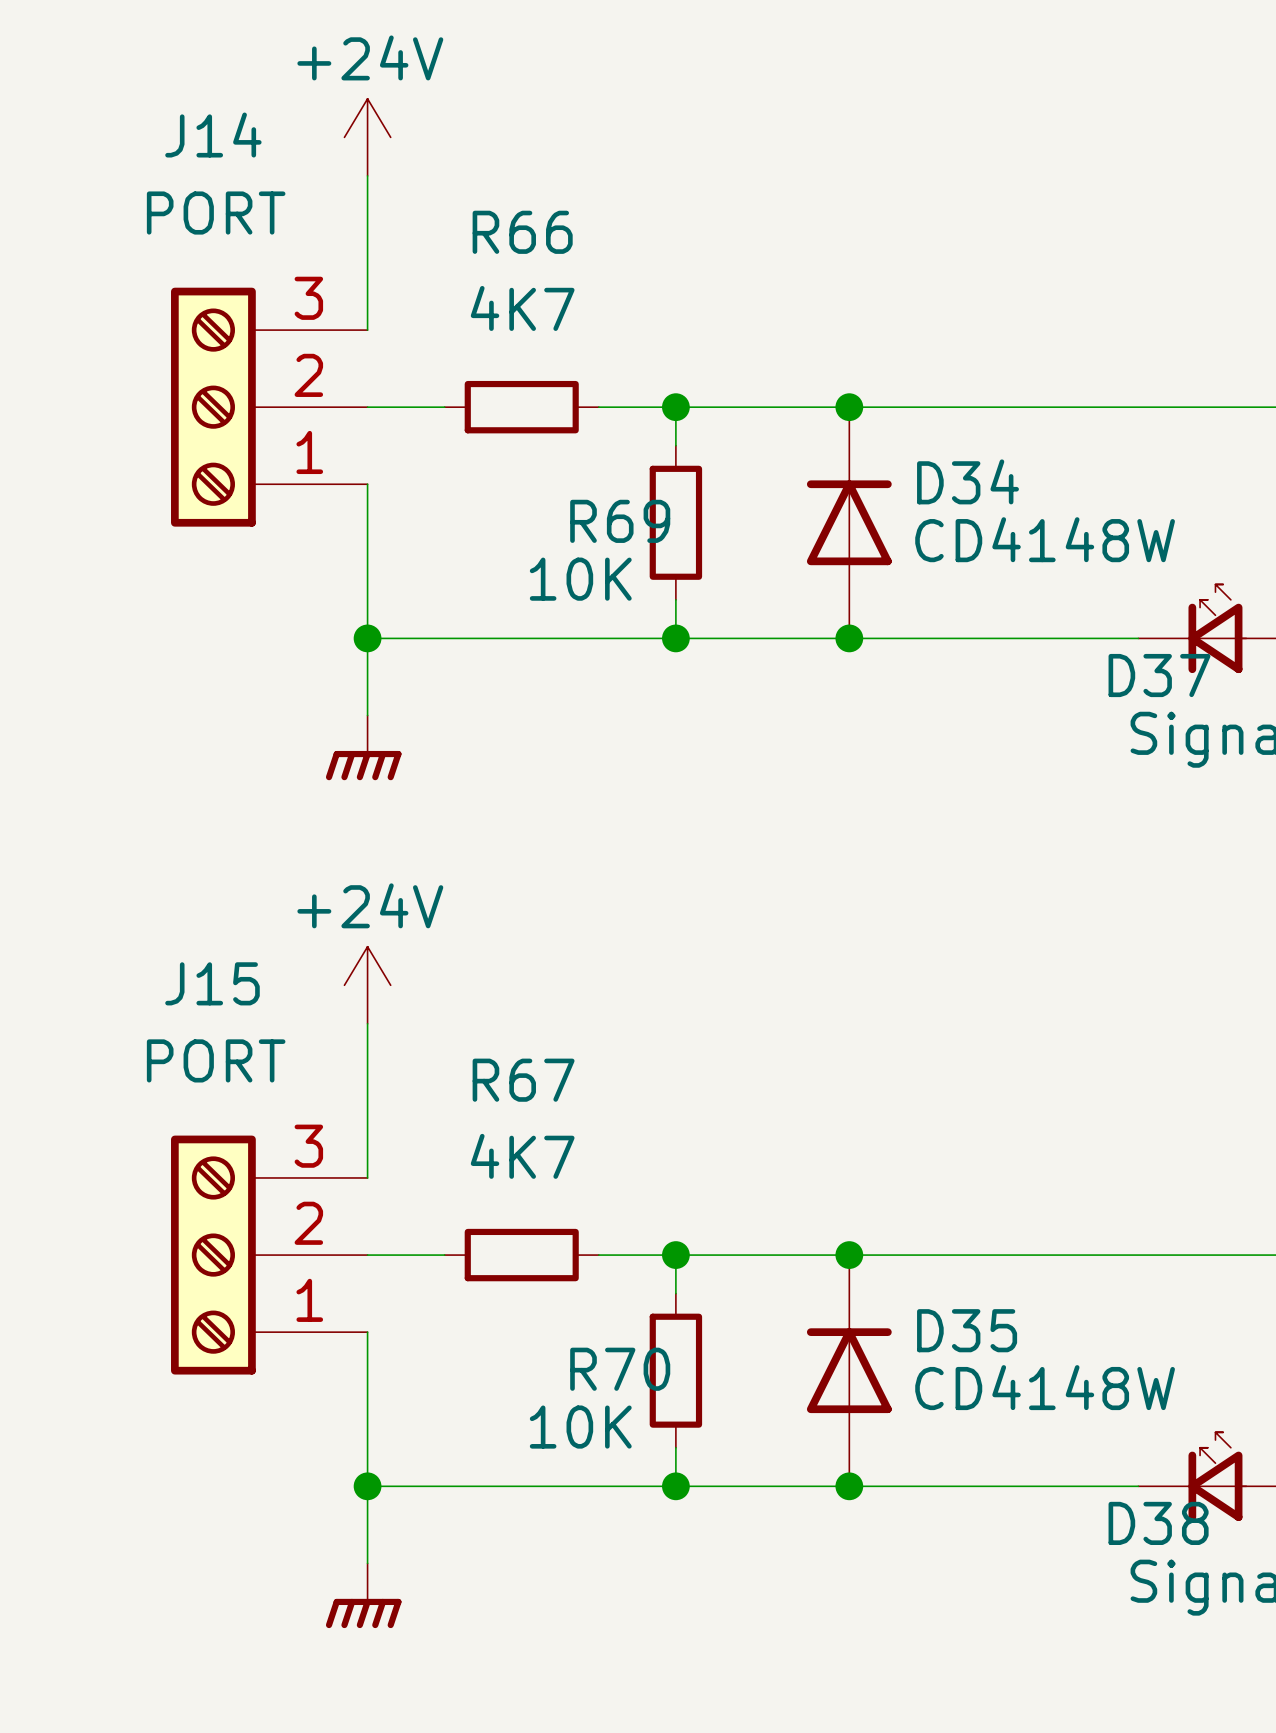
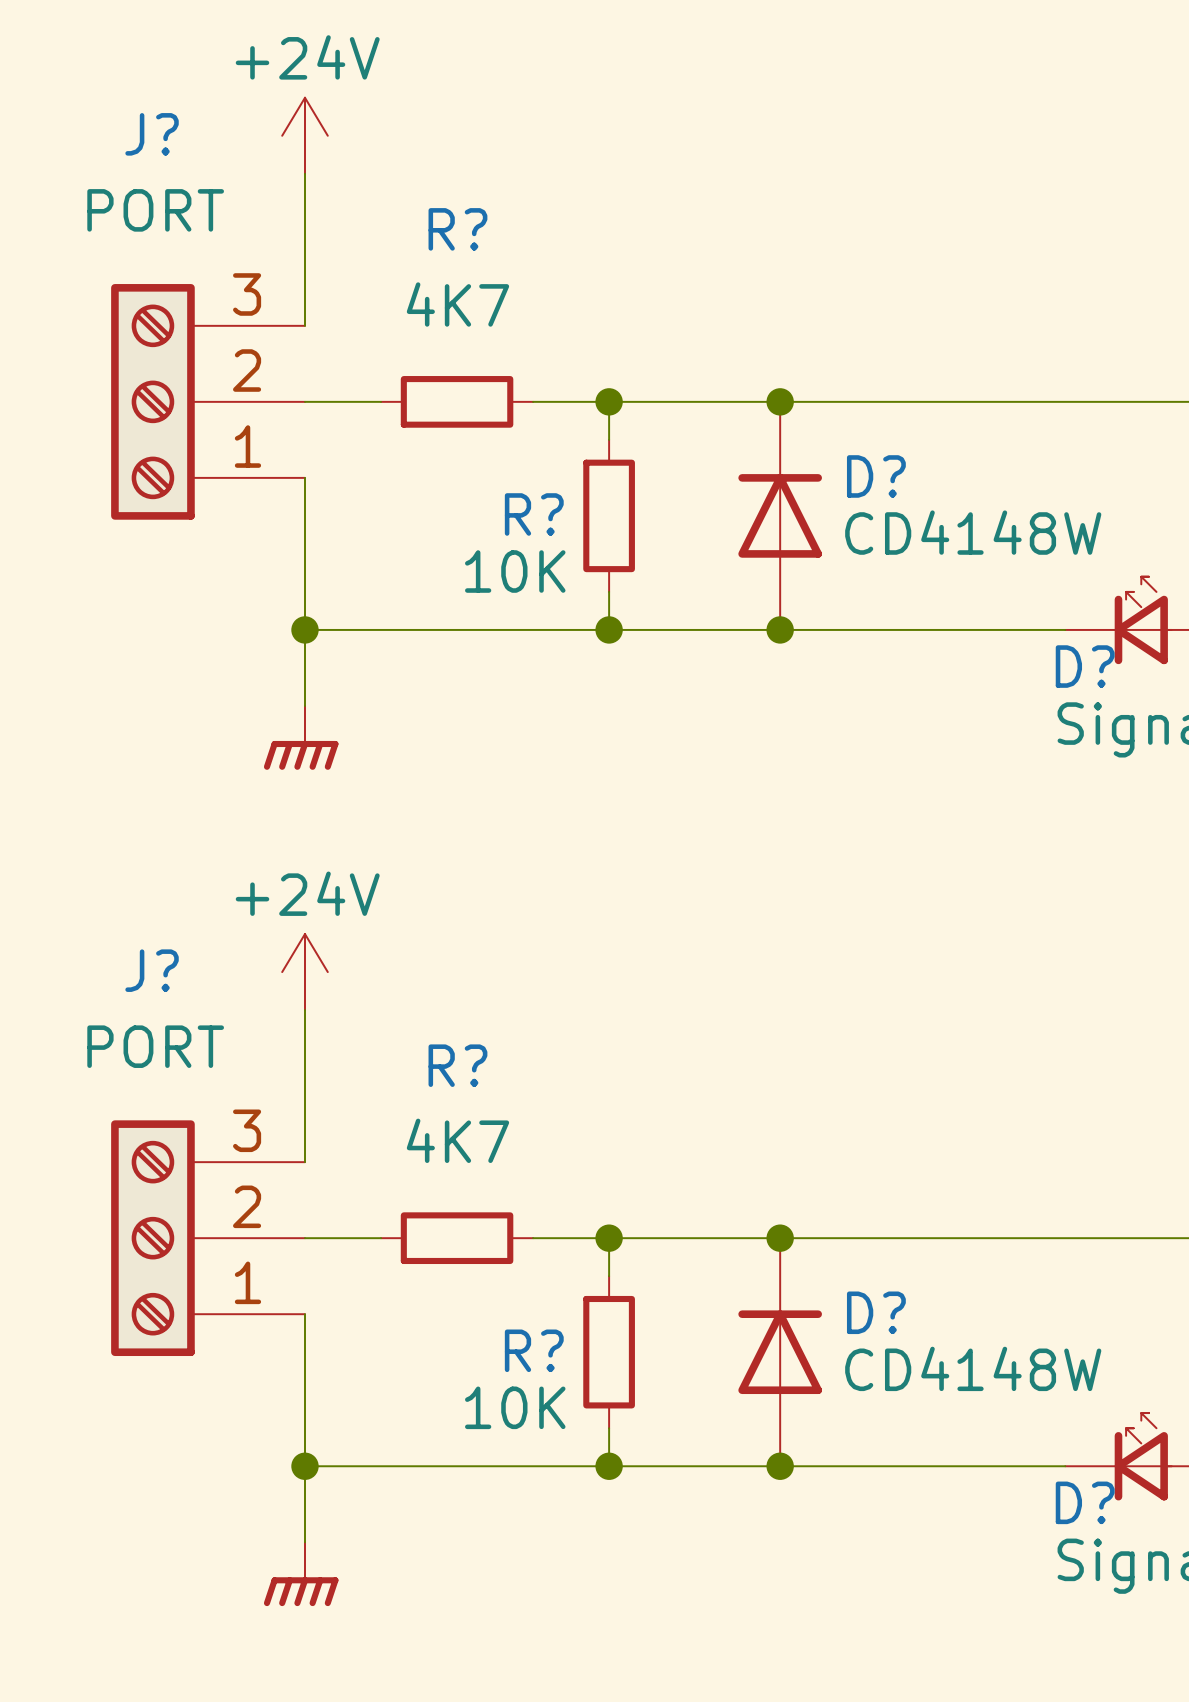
J14 name: J14 (213, 135) -> J? (152, 134)
R66 name: R66 (522, 232) -> R? (457, 229)
D34 name: D34 (968, 481) -> D? (876, 476)
R69 name: R69 (620, 521) -> R? (534, 514)
D37 name: D37 (1159, 675) -> D? (1085, 666)
J15 name: J15 (212, 983) -> J? (152, 970)
R67 name: R67 (523, 1080) -> R? (457, 1065)
D35 name: D35 (967, 1330) -> D? (876, 1312)
R70 name: R70 (620, 1369) -> R? (534, 1350)
D38 name: D38 (1158, 1523) -> D? (1085, 1502)

